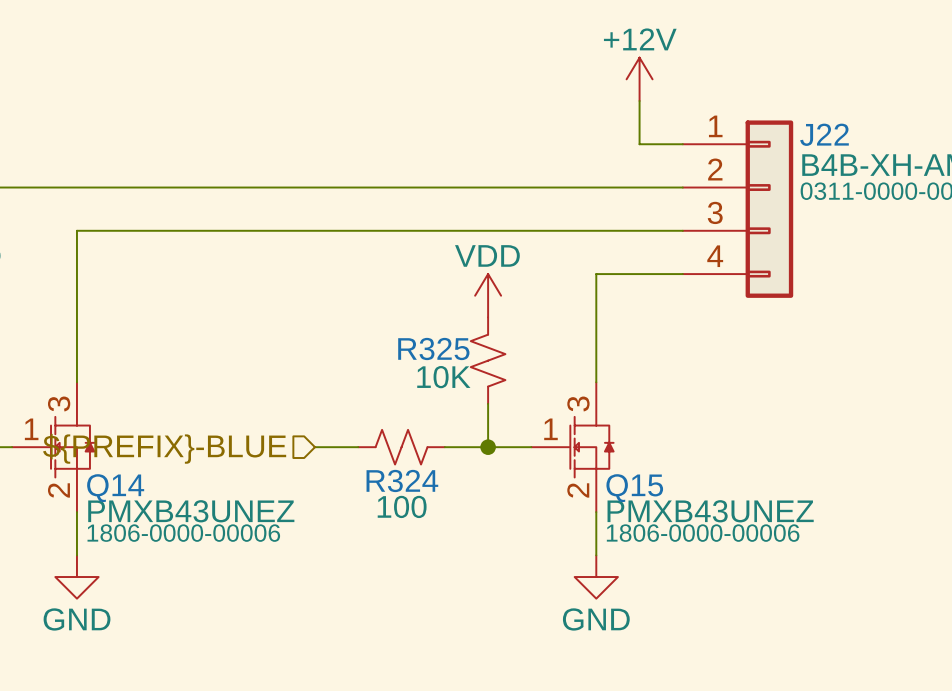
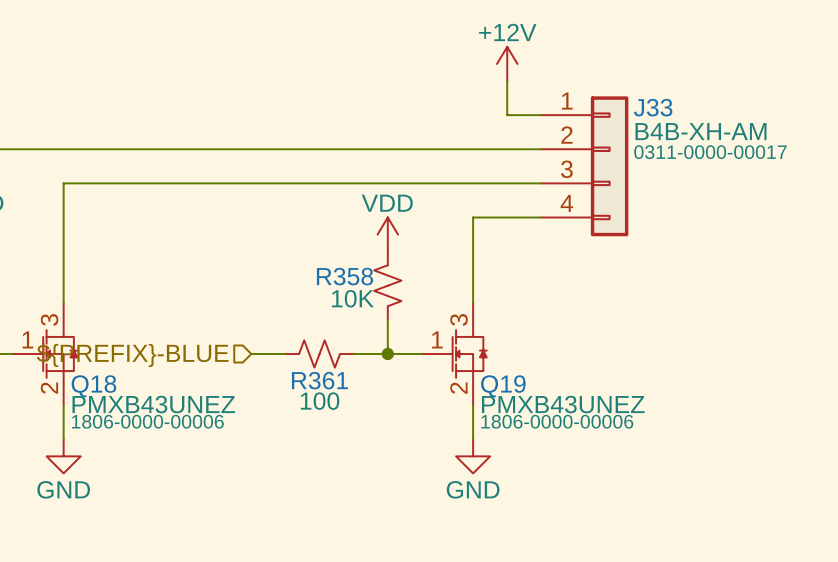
J22 name: J22 (824, 134) -> J33 (653, 107)
R325 name: R325 (433, 348) -> R358 (344, 276)
R324 name: R324 (402, 480) -> R361 (319, 380)
Q14 name: Q14 (115, 488) -> Q18 (93, 386)
Q15 name: Q15 (634, 488) -> Q19 (503, 386)

